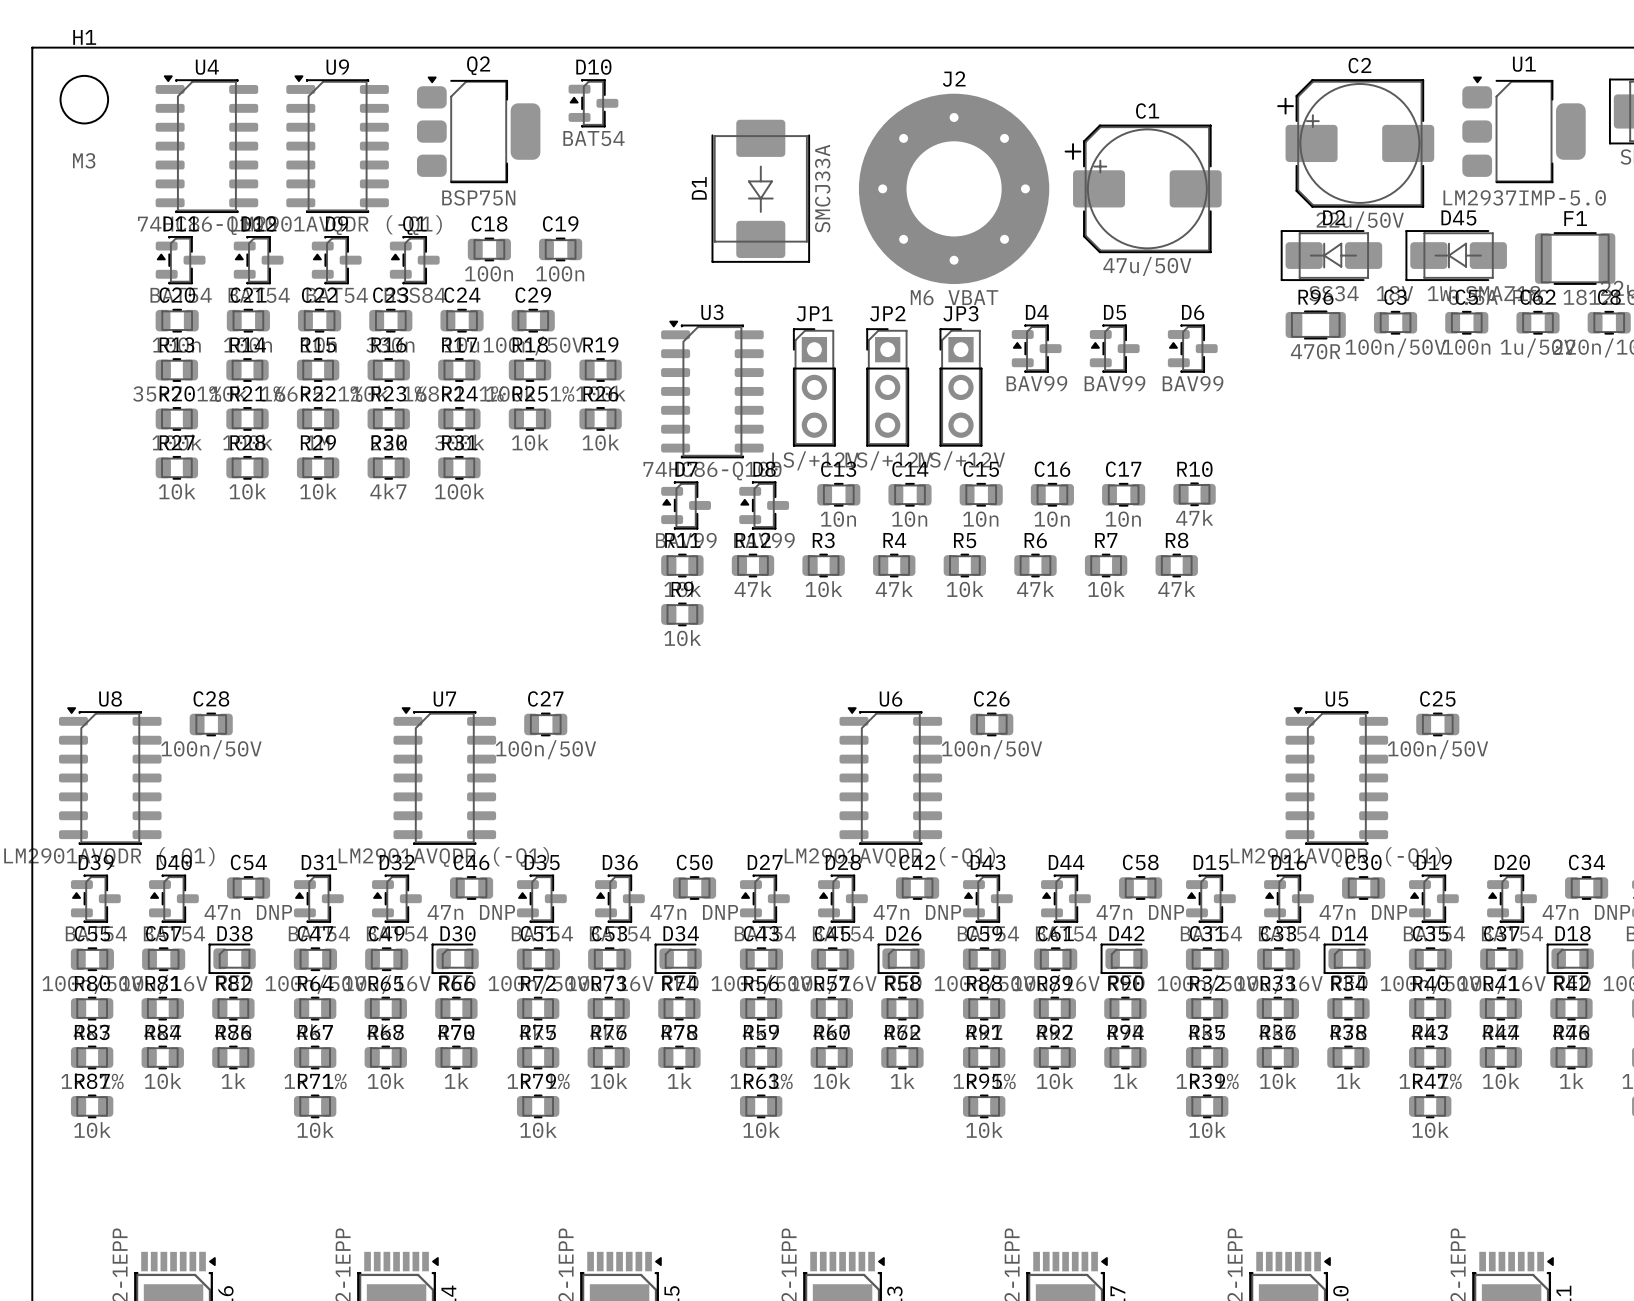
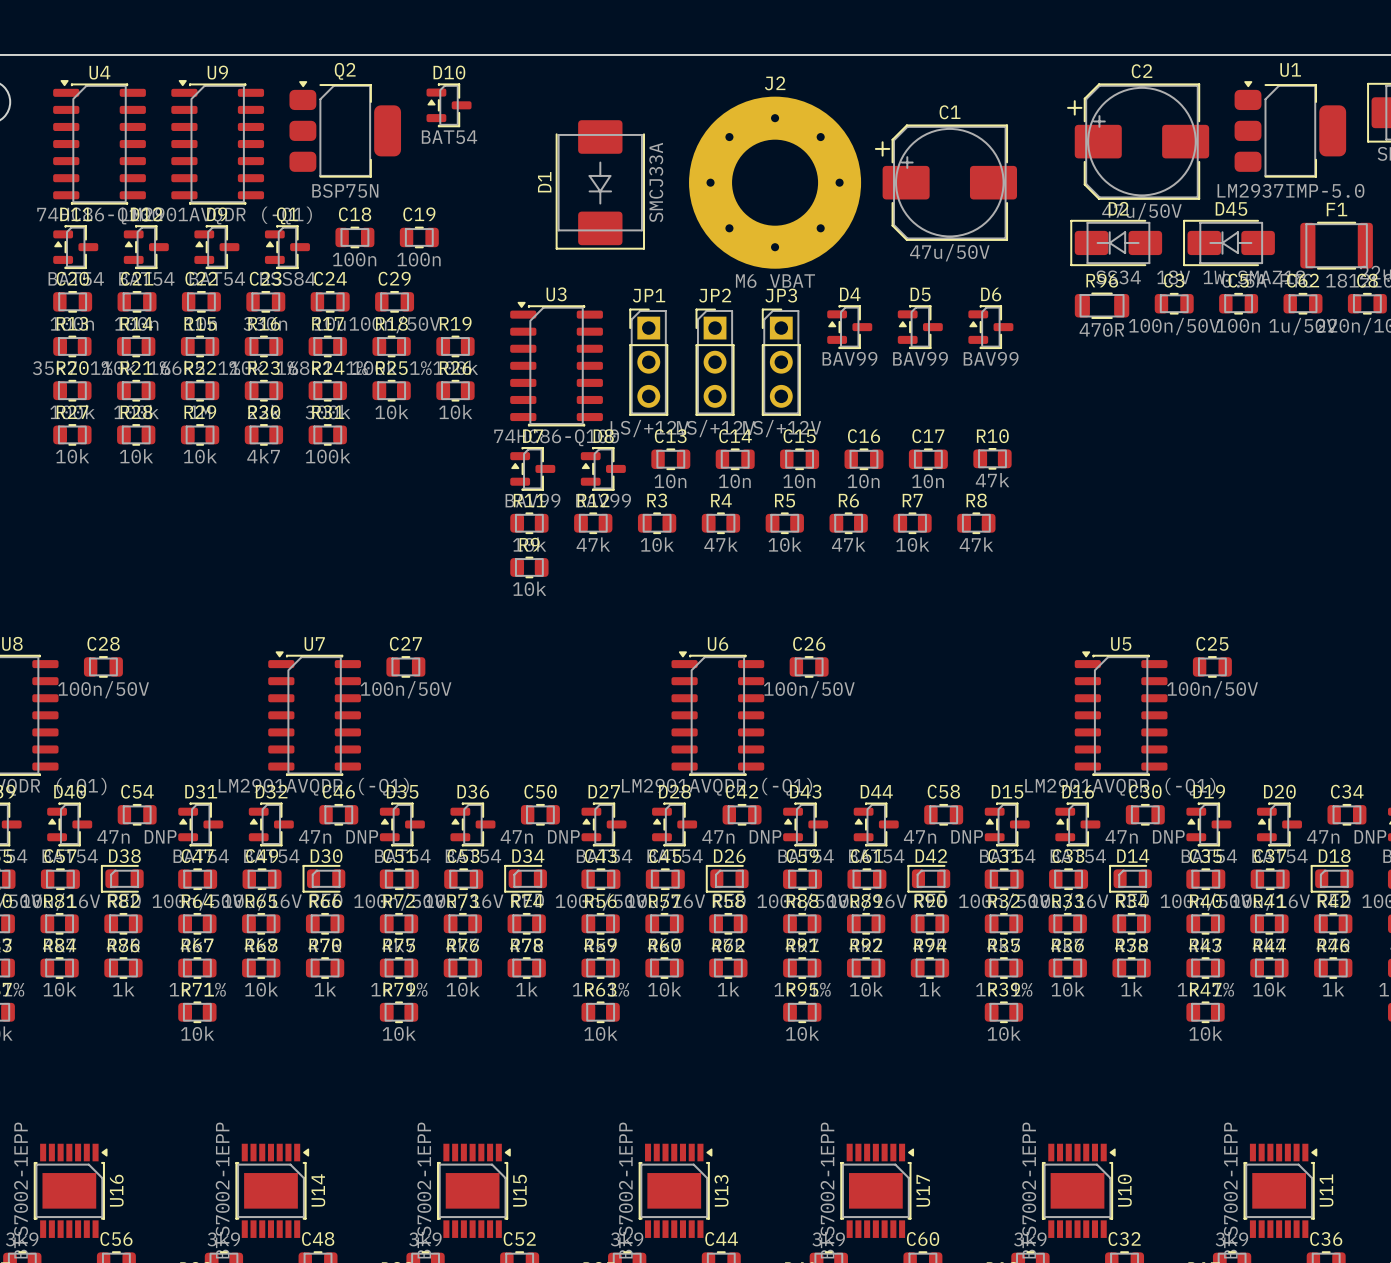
C2 value: 22u/50V (1360, 221) -> 47u/50V (1141, 211)

